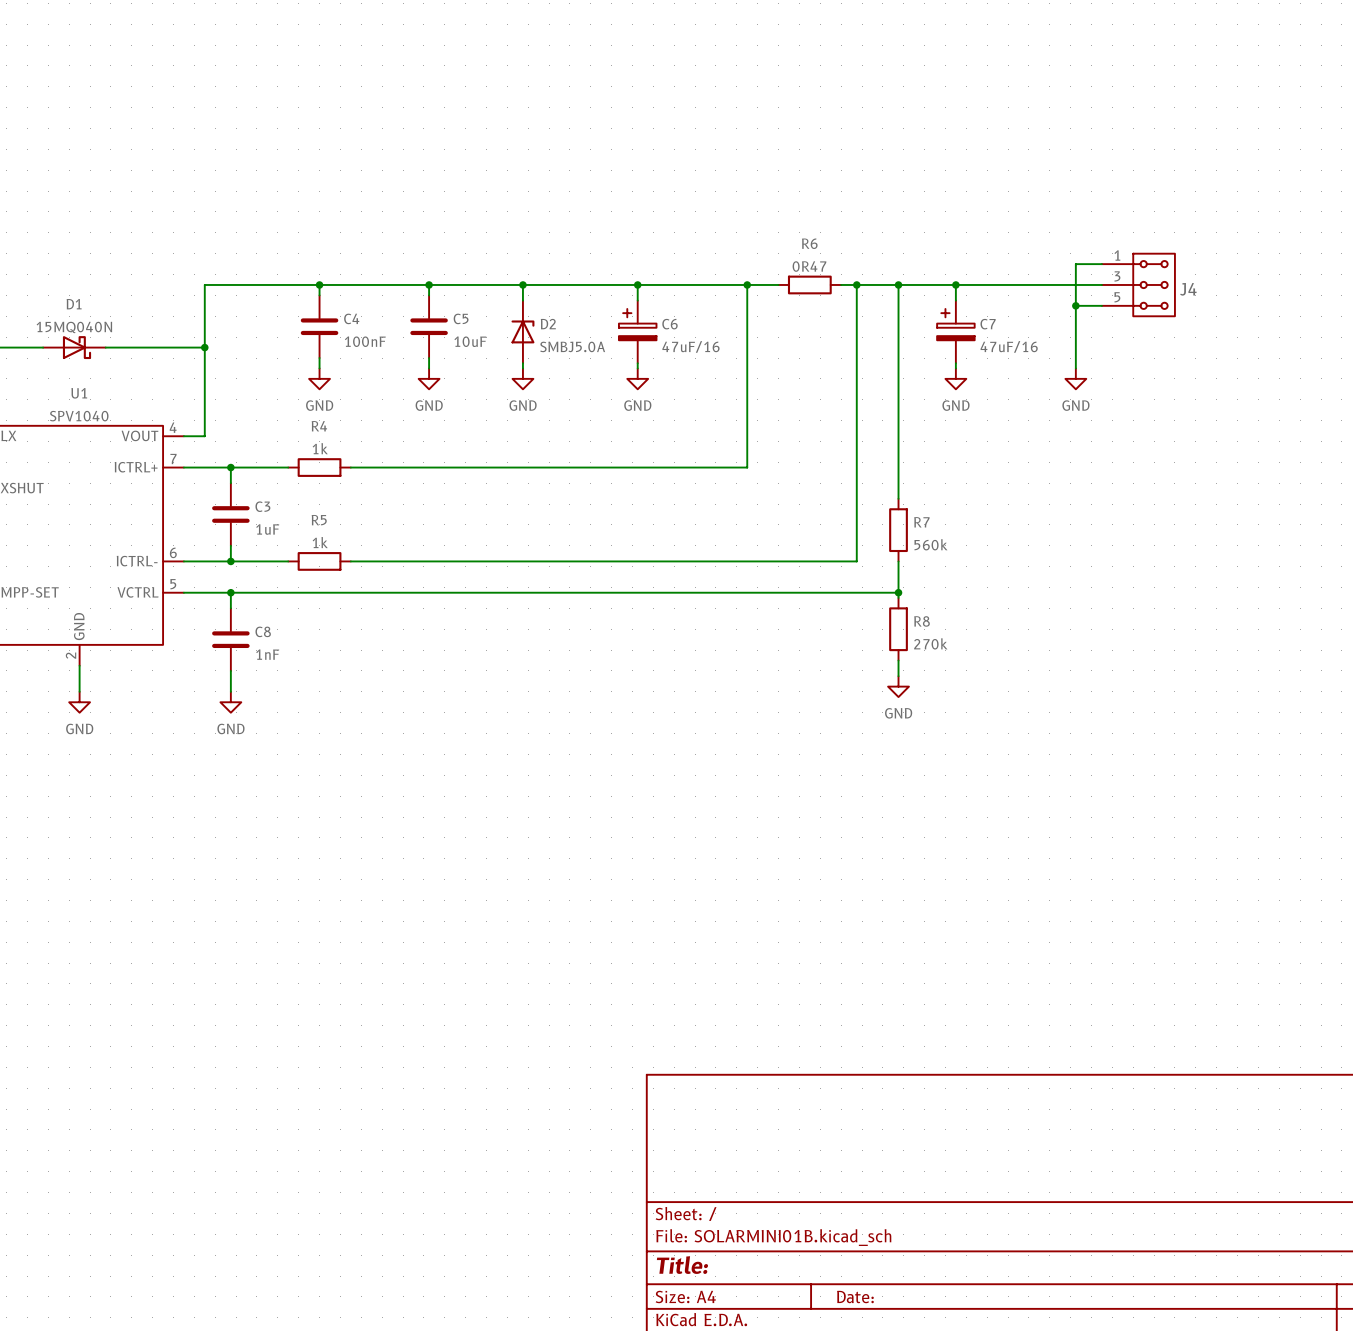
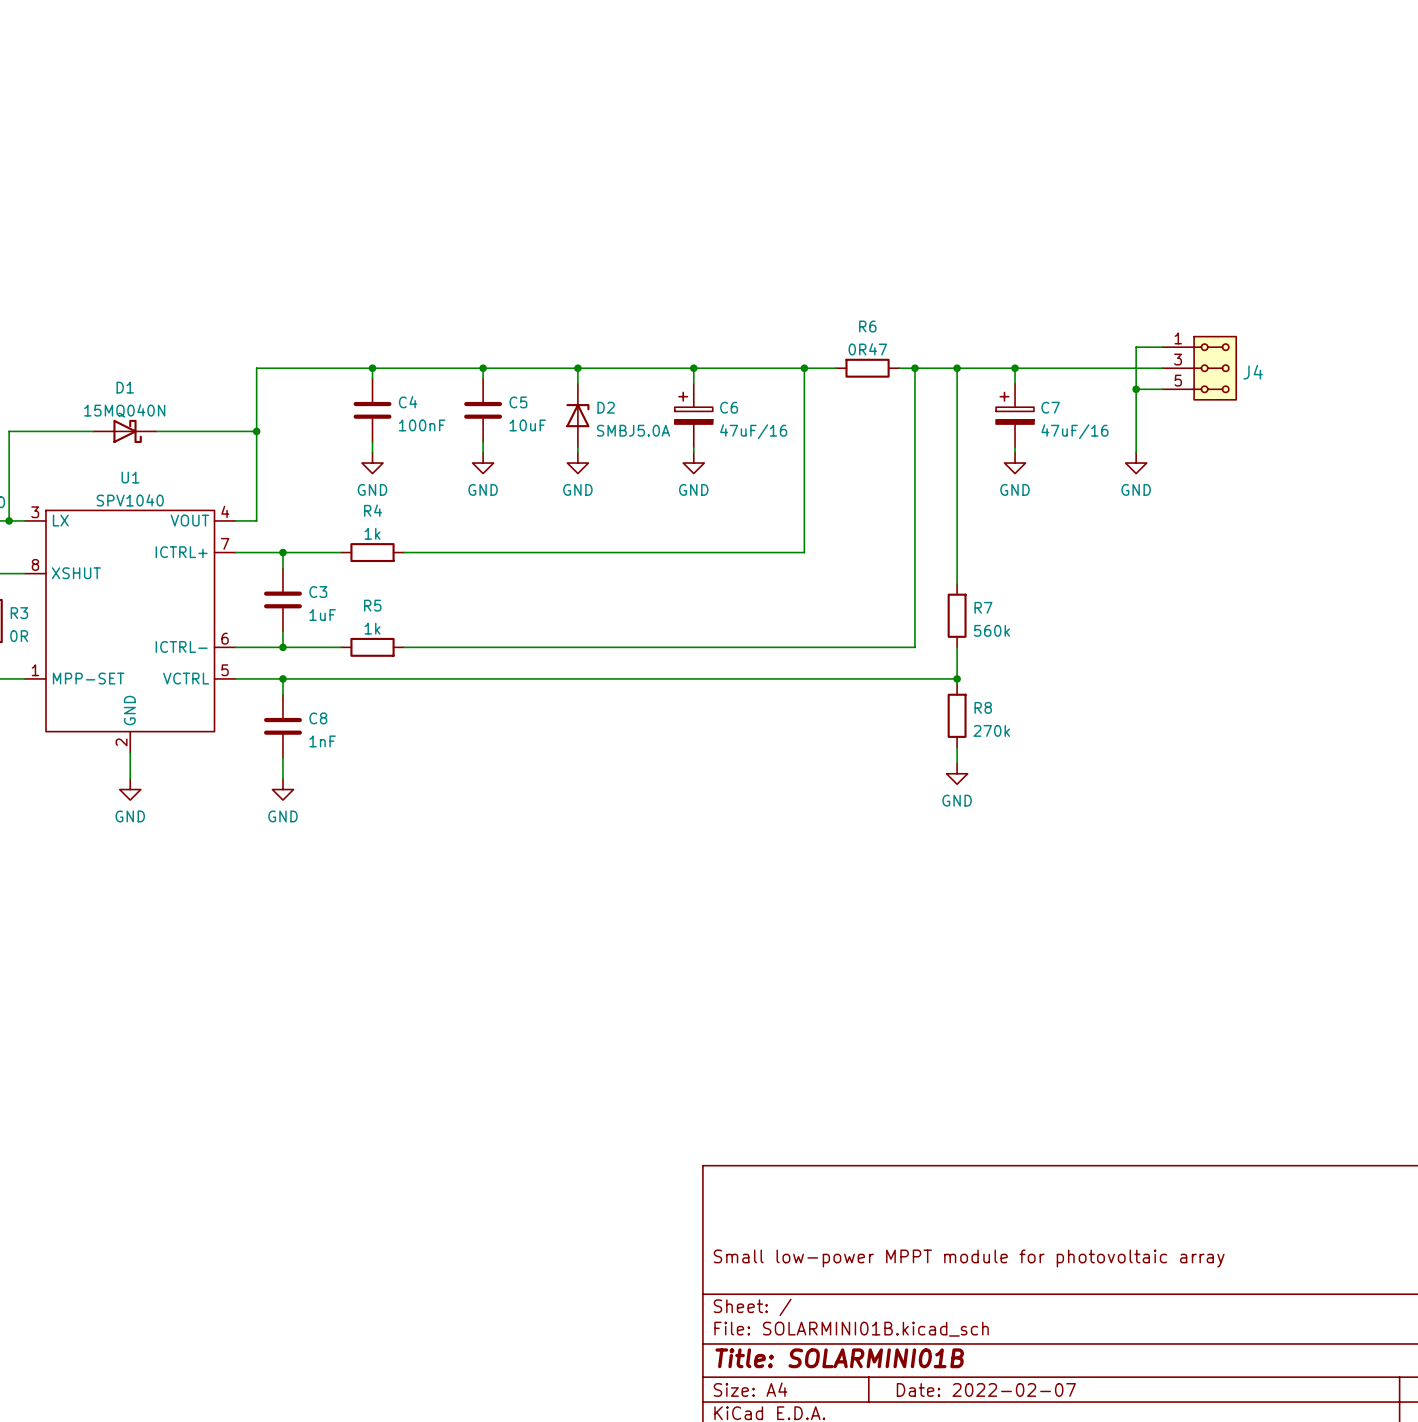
title block: none -> Small low-power MPPT module for photovoltaic array (969, 1258)
title block: Title: (682, 1265) -> Title: SOLARMINI01B (839, 1358)
title block: Date: (855, 1297) -> Date: 2022-02-07 (986, 1389)

